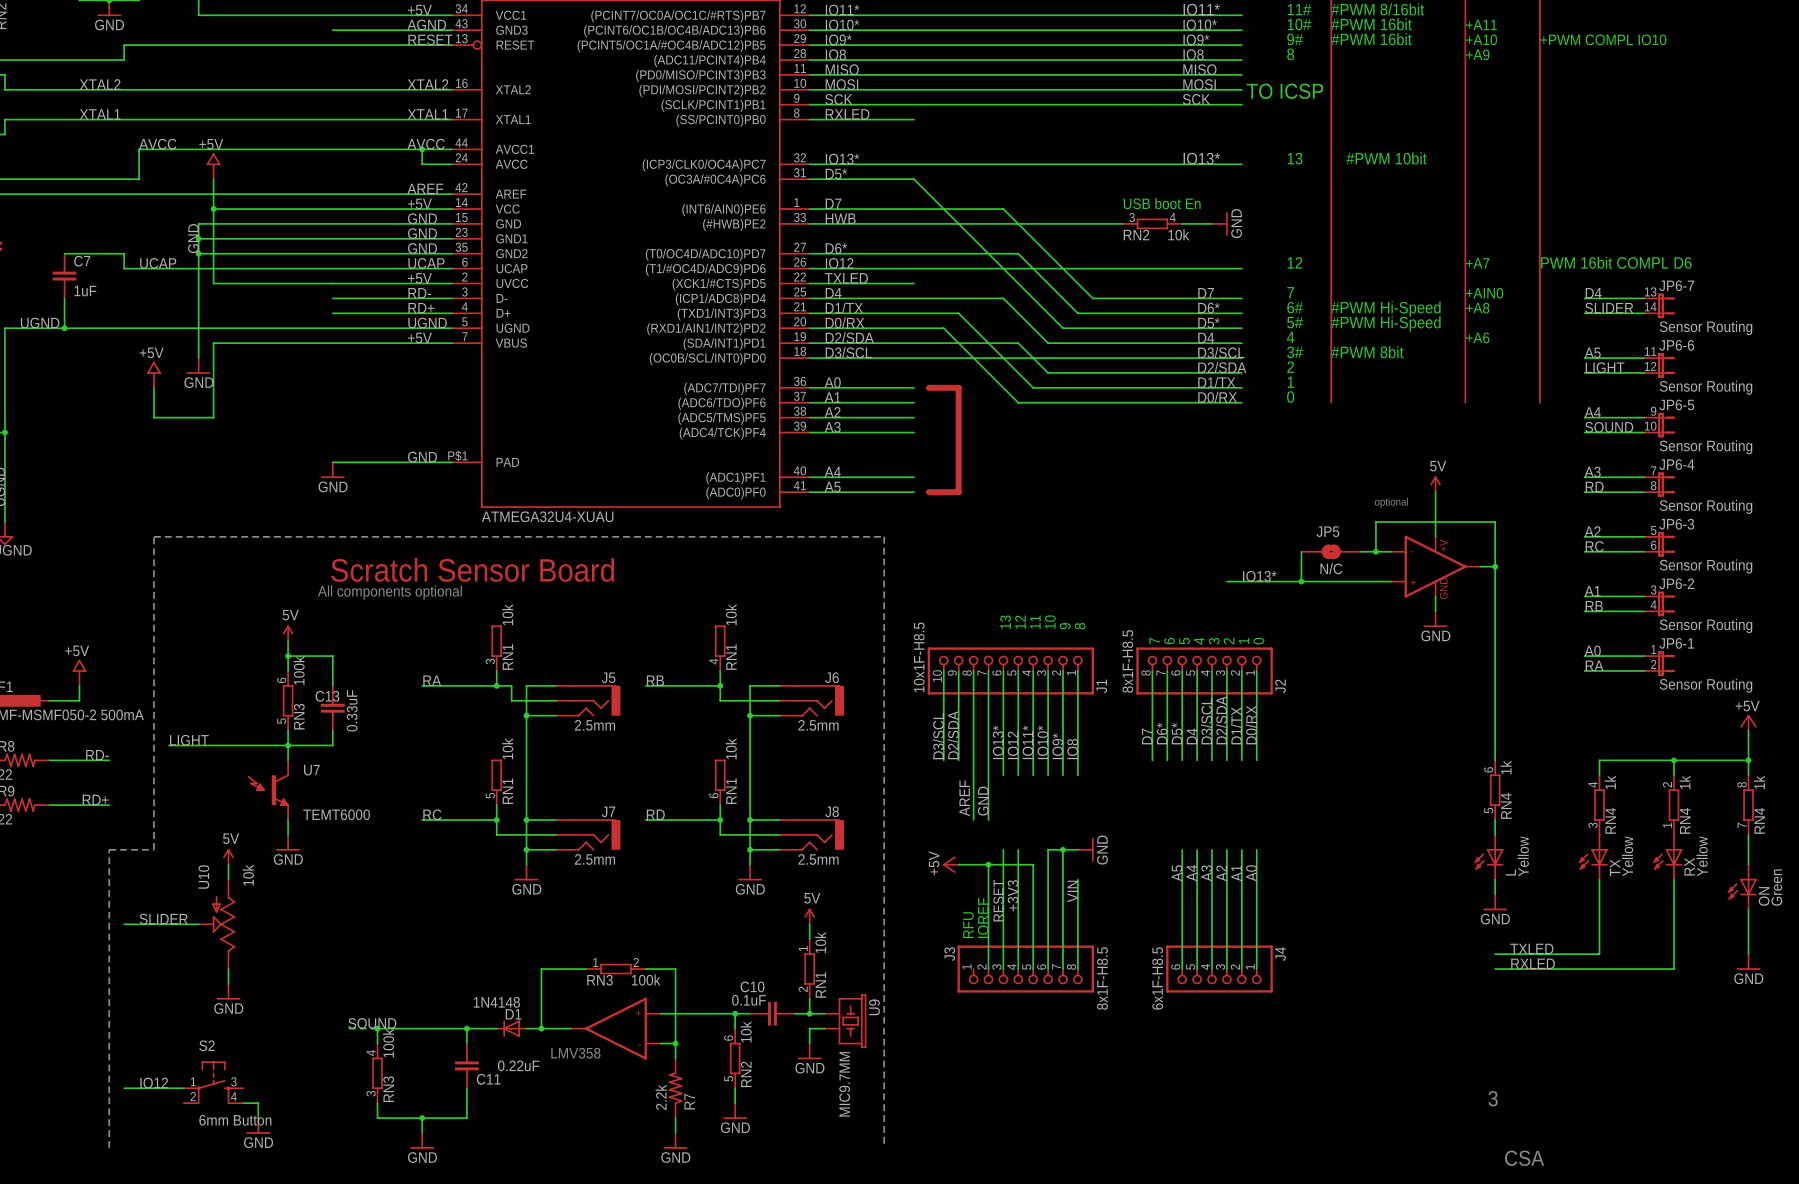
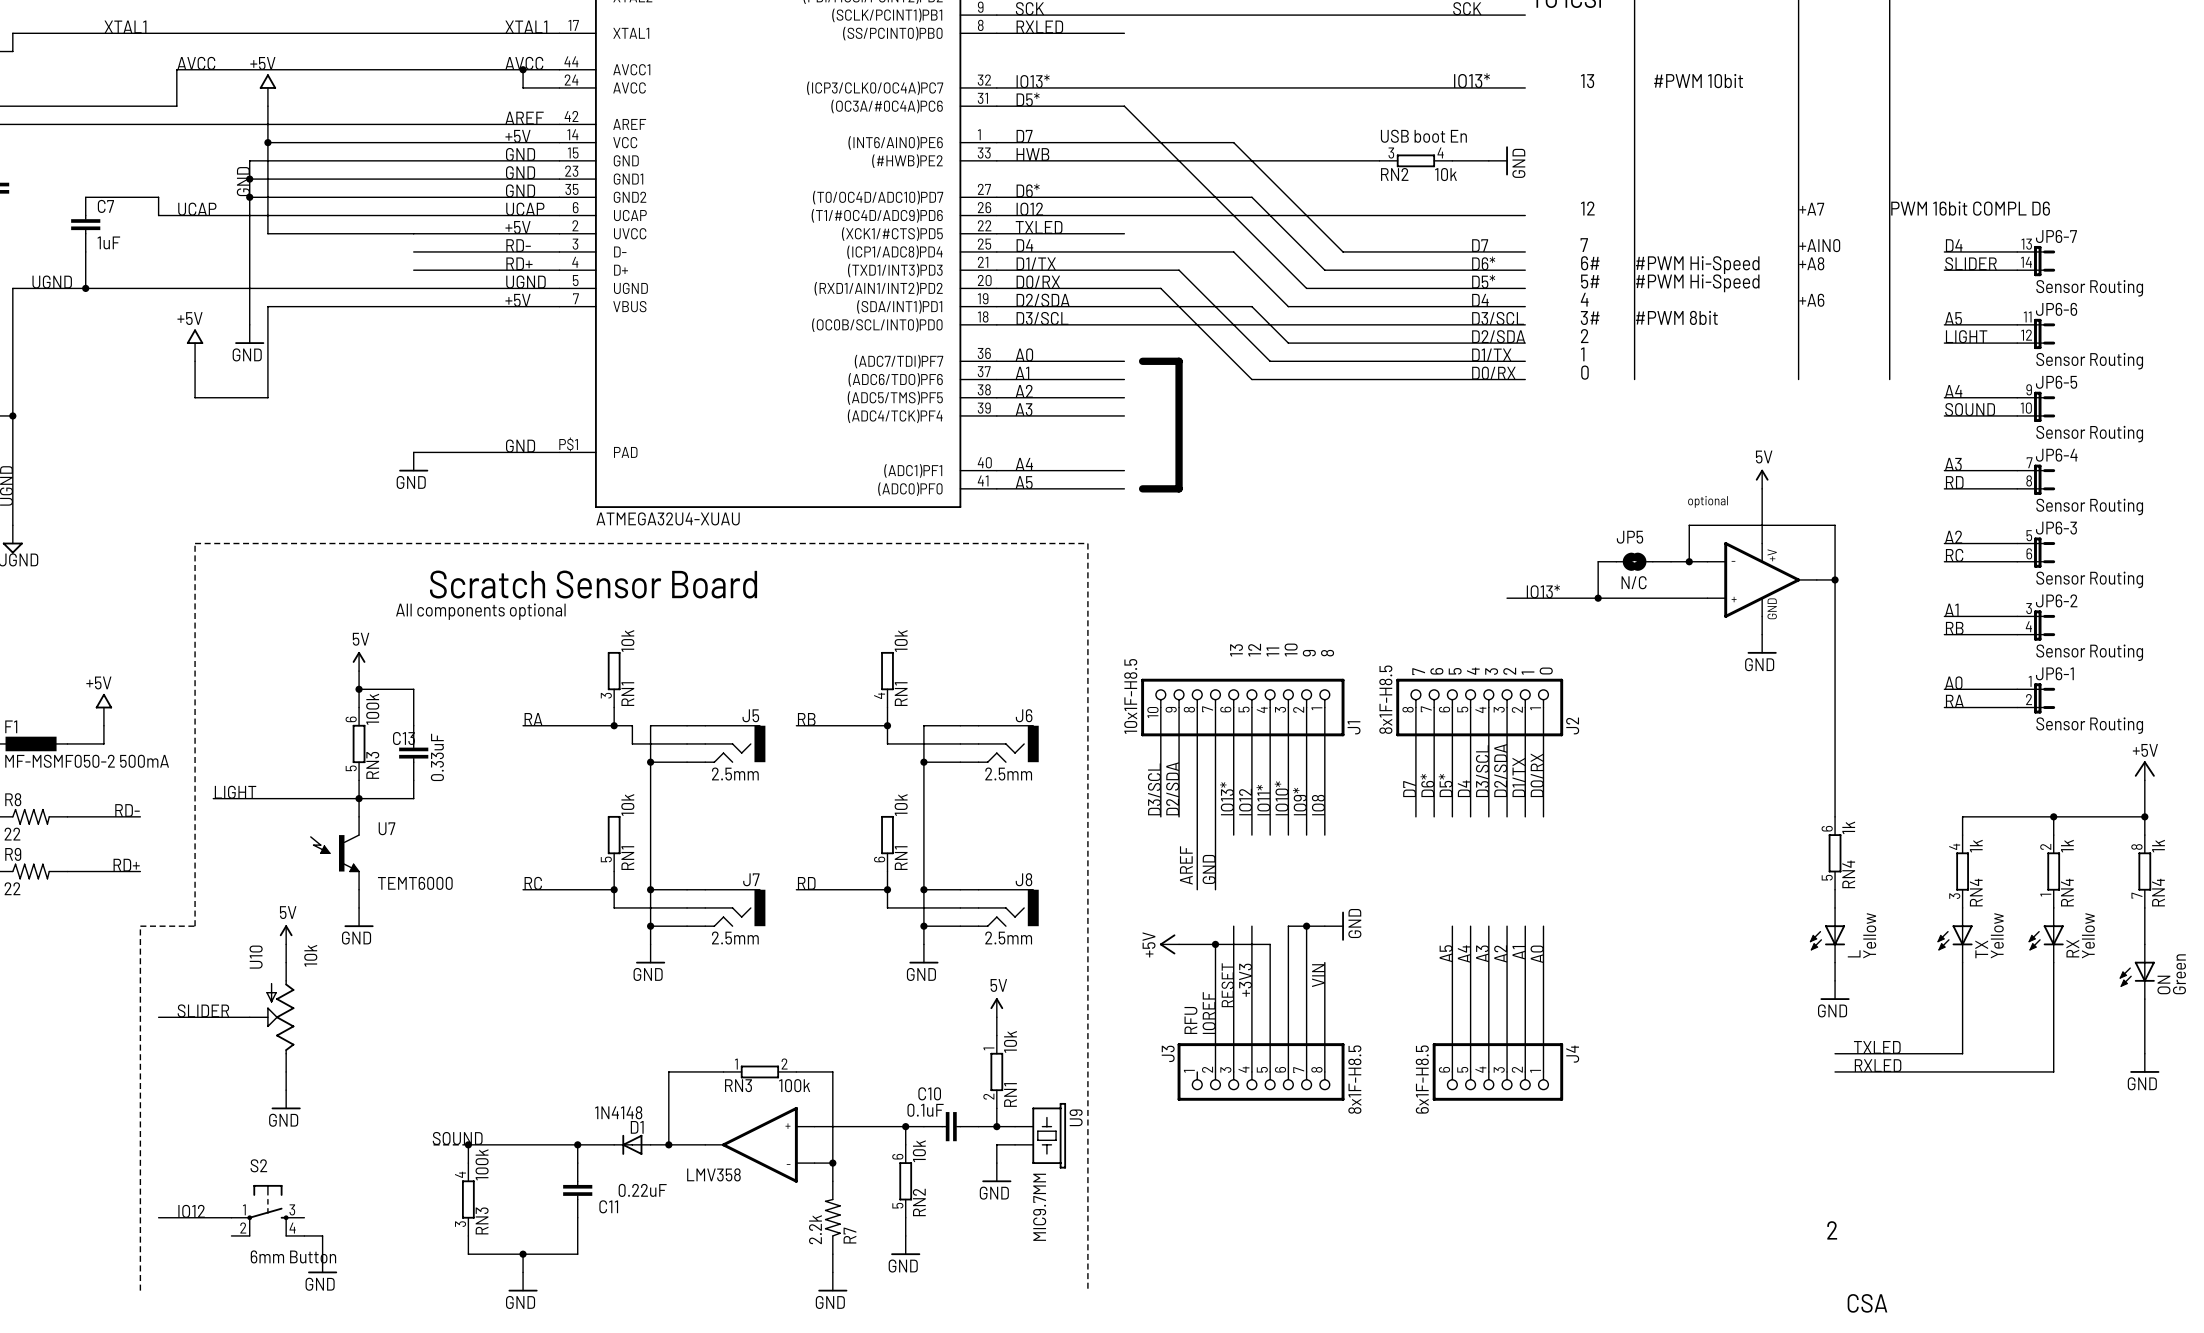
text: 3 (1493, 1098) -> 2 (1832, 1230)

